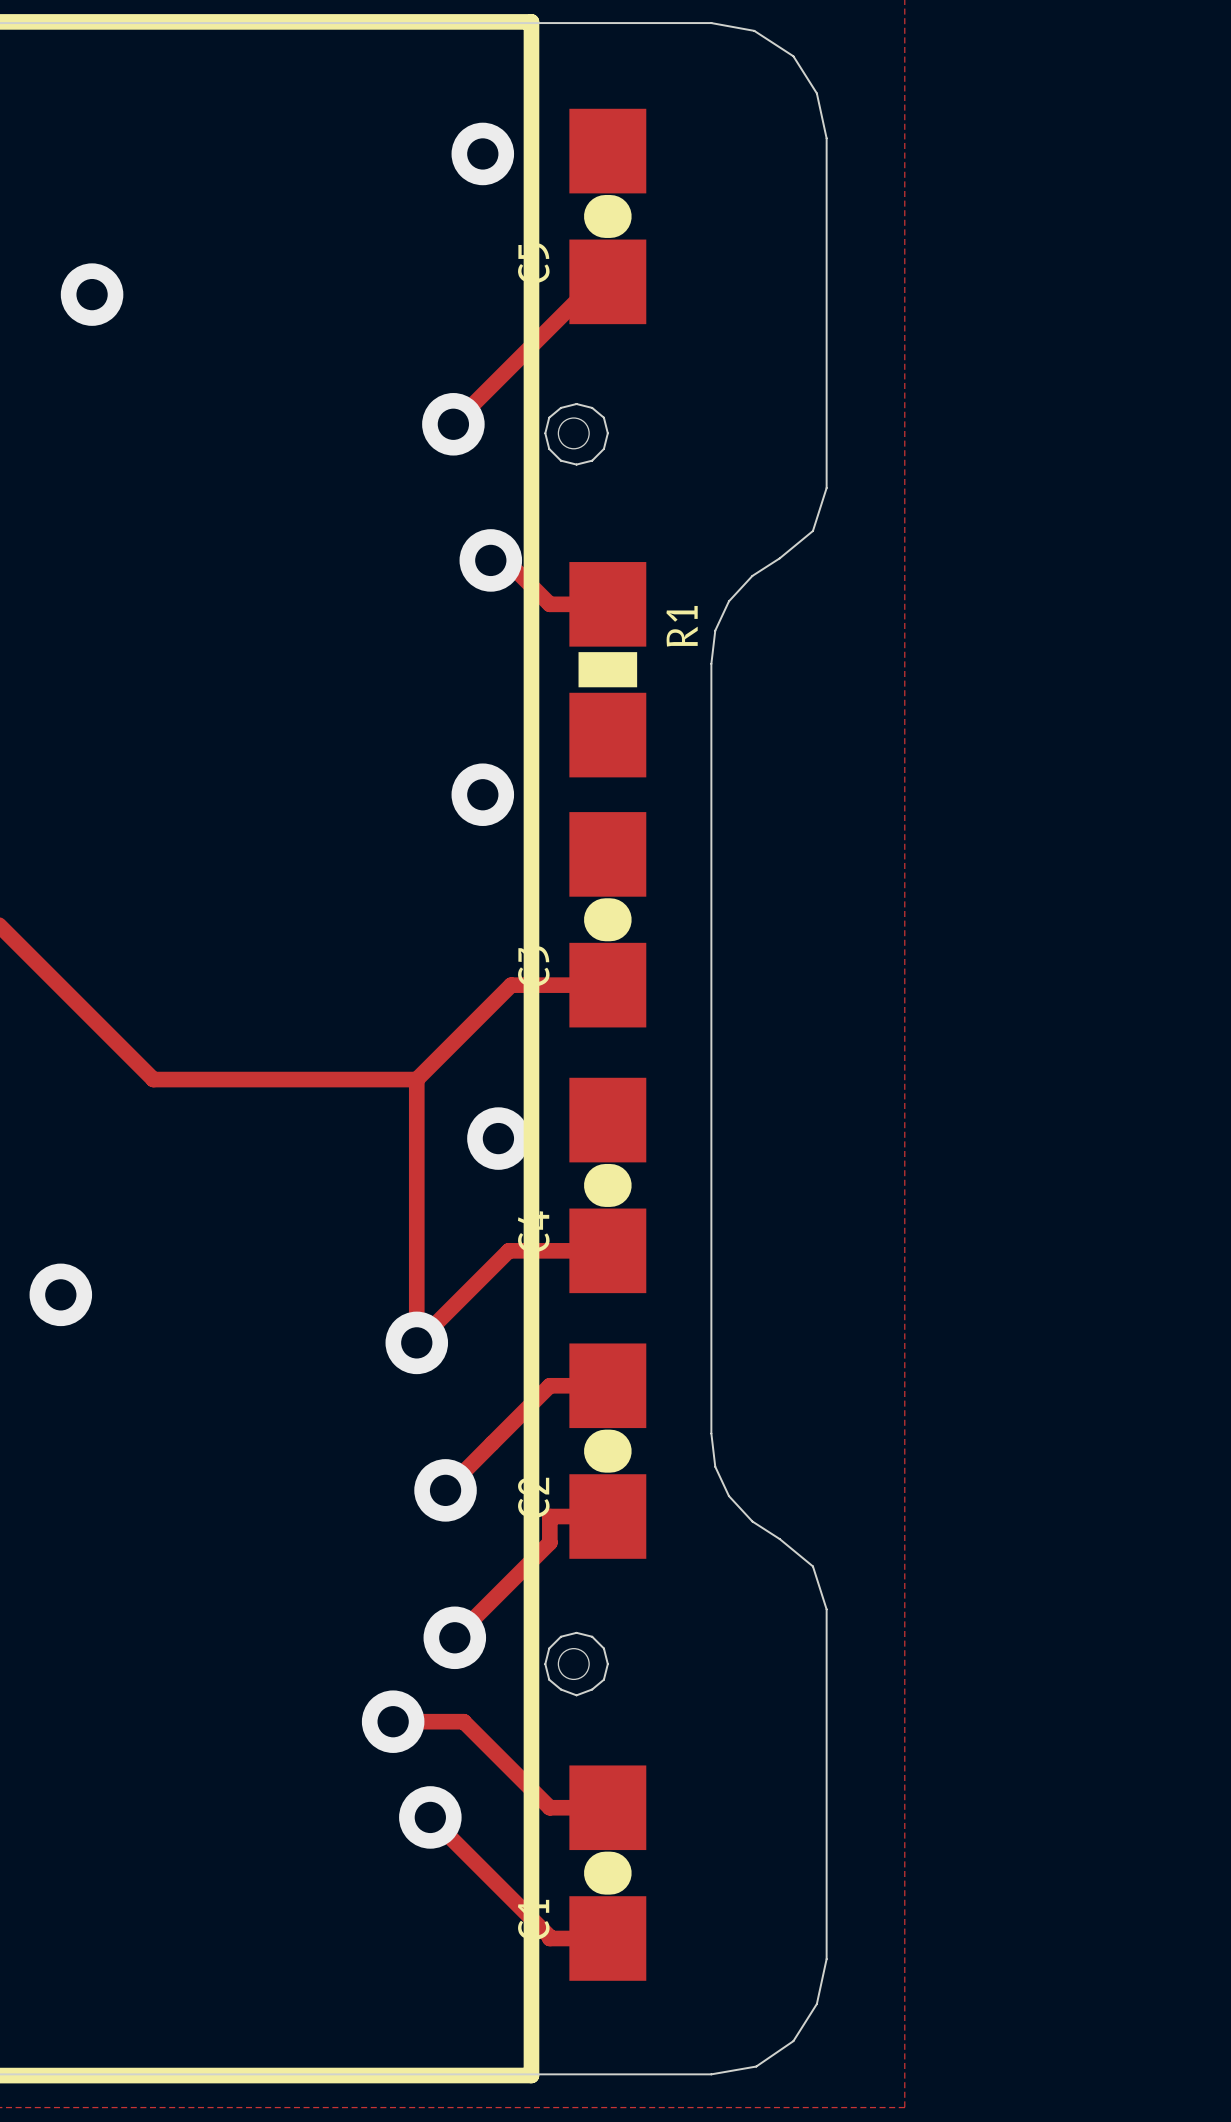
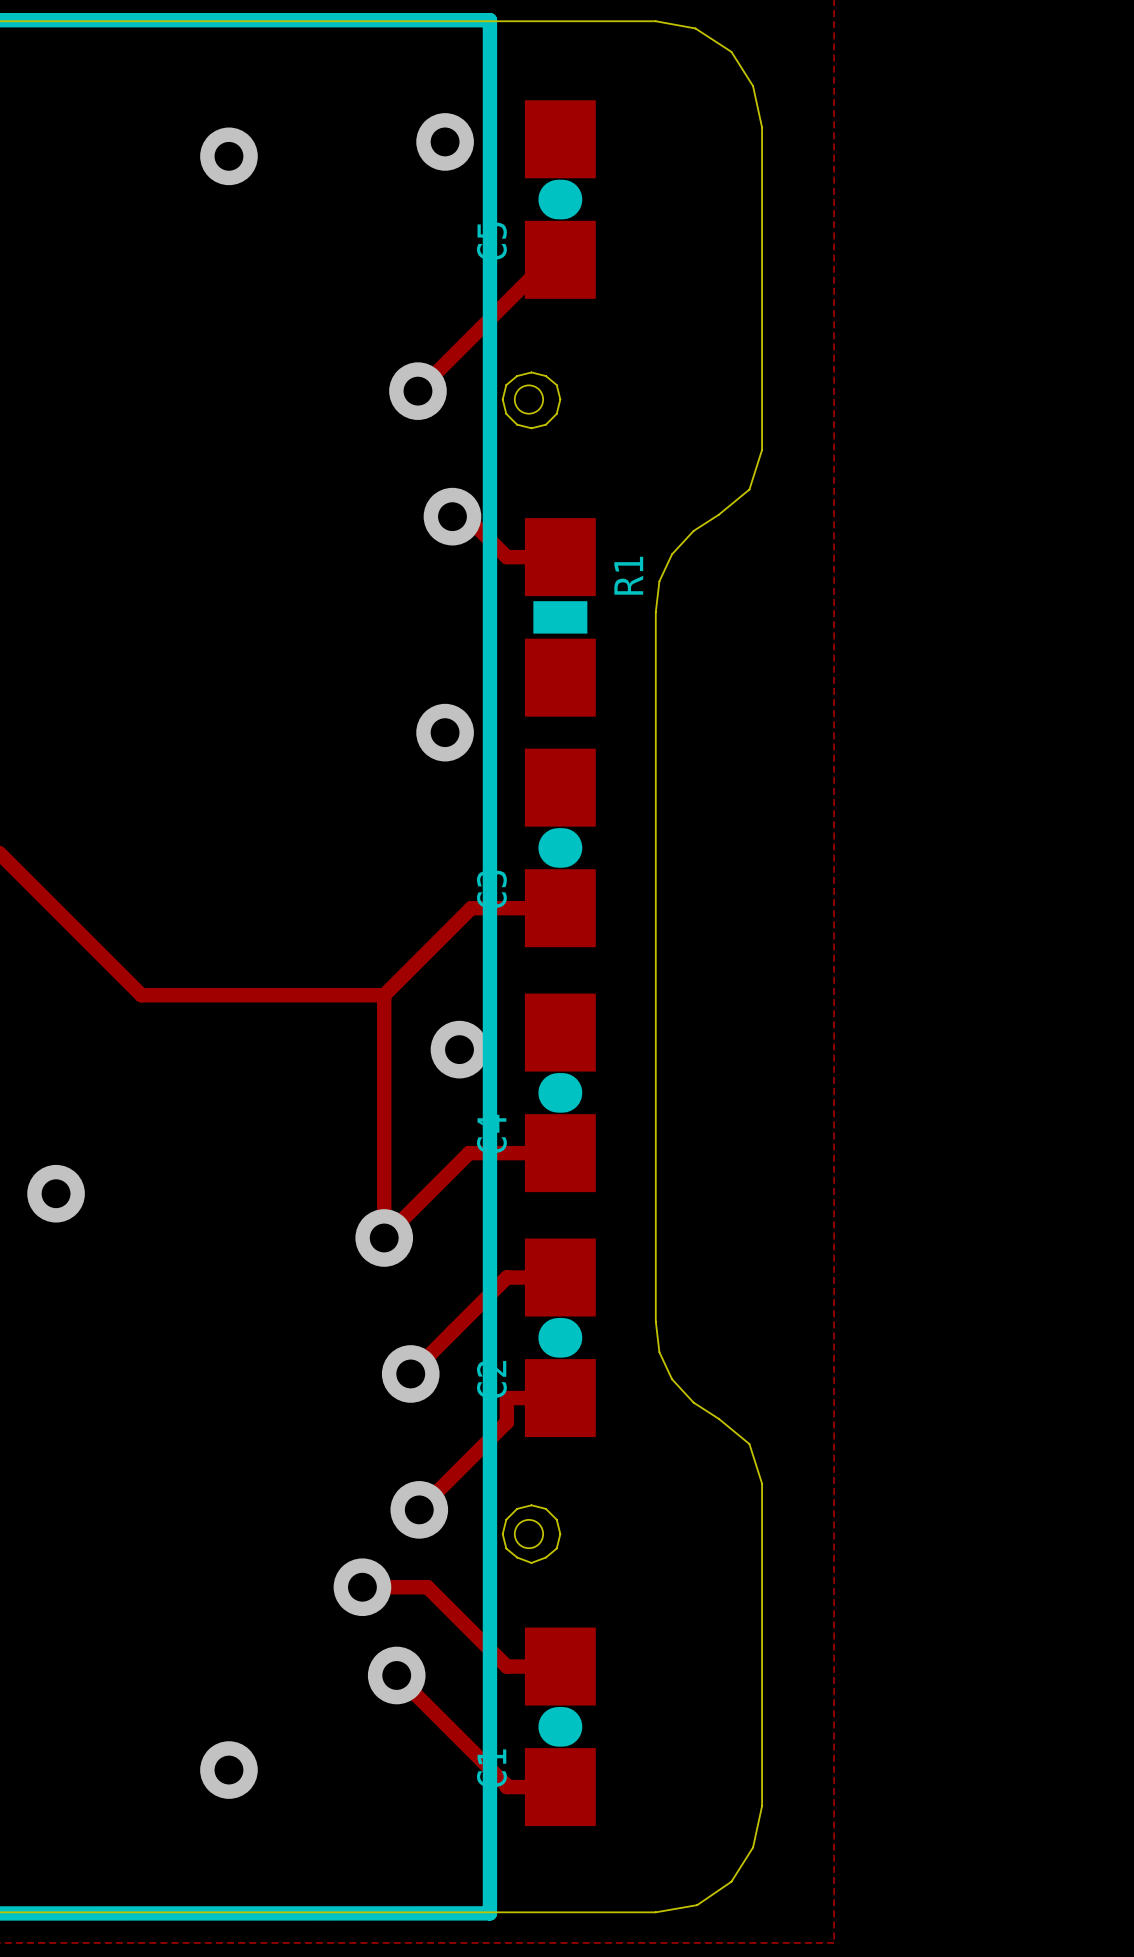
via position: (92, 294) -> (228, 156)
via: none -> (228, 1770)

